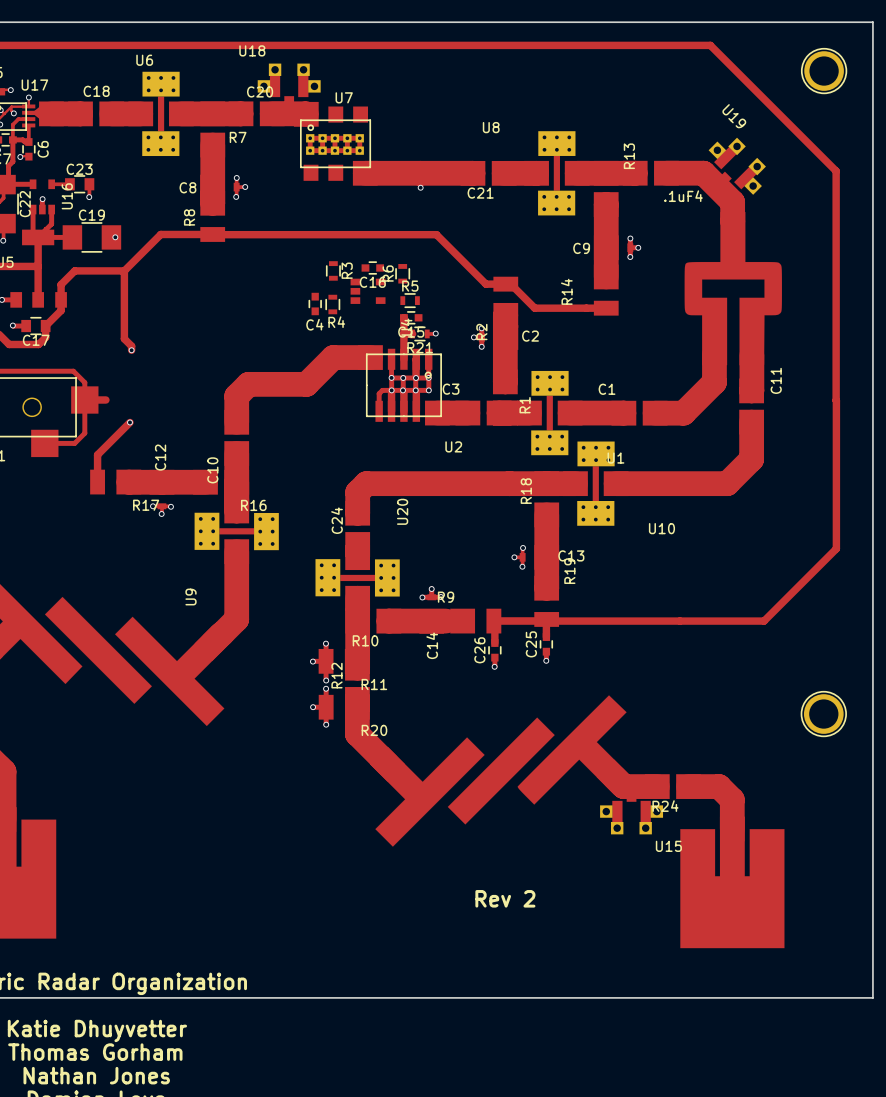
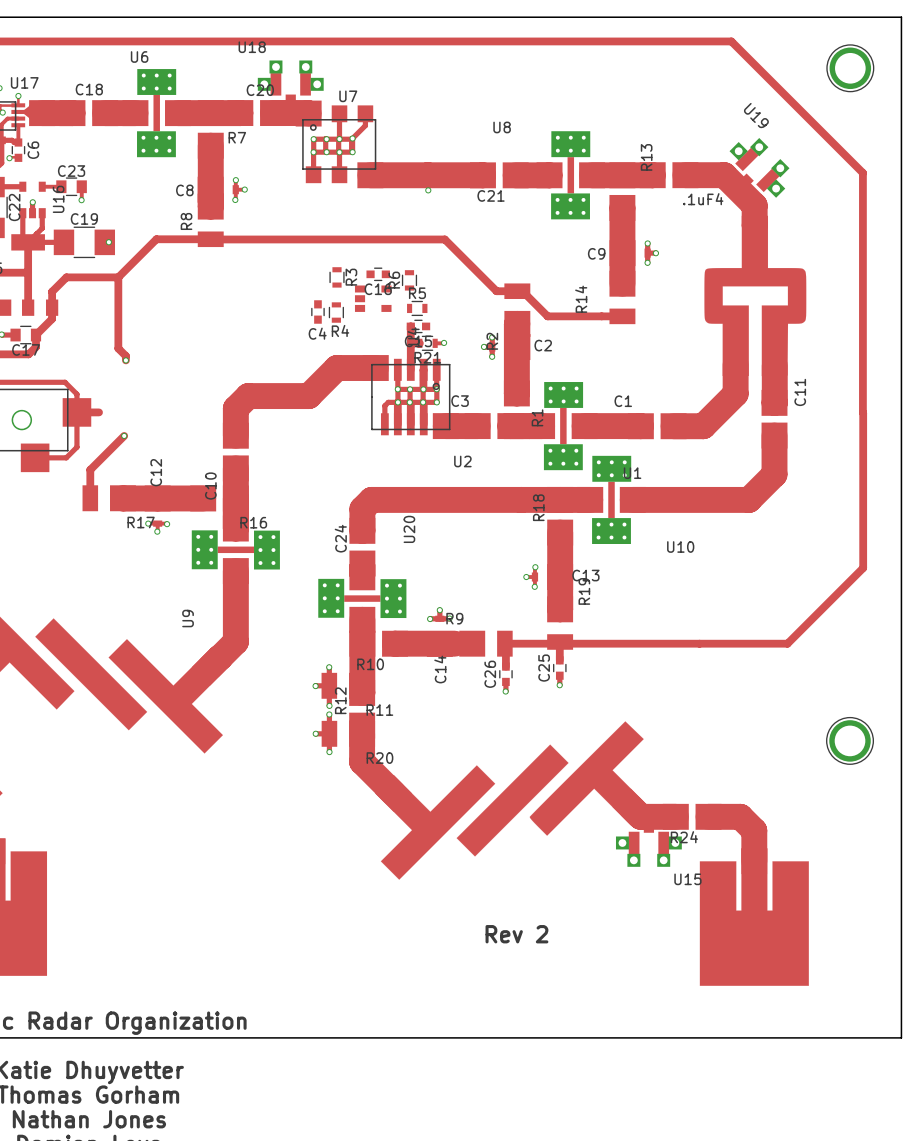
track: none -> (339, 113) (339, 139)
track: none -> (365, 113) (365, 125) (352, 138) (352, 152) (313, 152) (313, 139) (352, 139)
track: (310, 138) (359, 138) (359, 150) (310, 150) (310, 138) -> none
part: (310, 138) -> none
via: none -> (313, 139)
part: (322, 138) -> none
via: none -> (326, 139)
part: (334, 138) -> none
via: none -> (339, 139)
part: (347, 138) -> none
via: none -> (352, 138)
part: (359, 138) -> none
part: (310, 150) -> none
part: (322, 150) -> none
part: (334, 150) -> none
part: (347, 150) -> none
part: (359, 150) -> none
track: none -> (313, 152) (313, 174)
via: none -> (313, 152)
via: none -> (326, 152)
track: none -> (339, 152) (339, 174)
via: none -> (339, 152)
via: none -> (352, 152)

